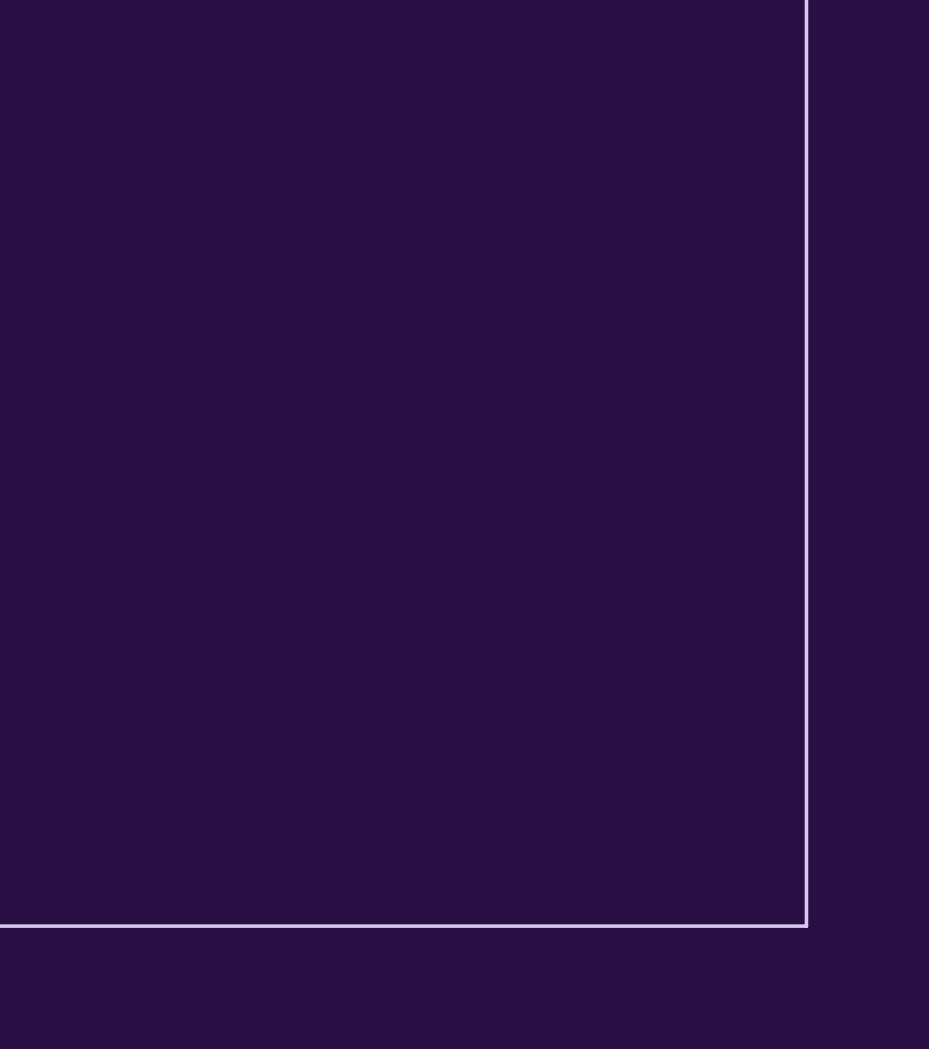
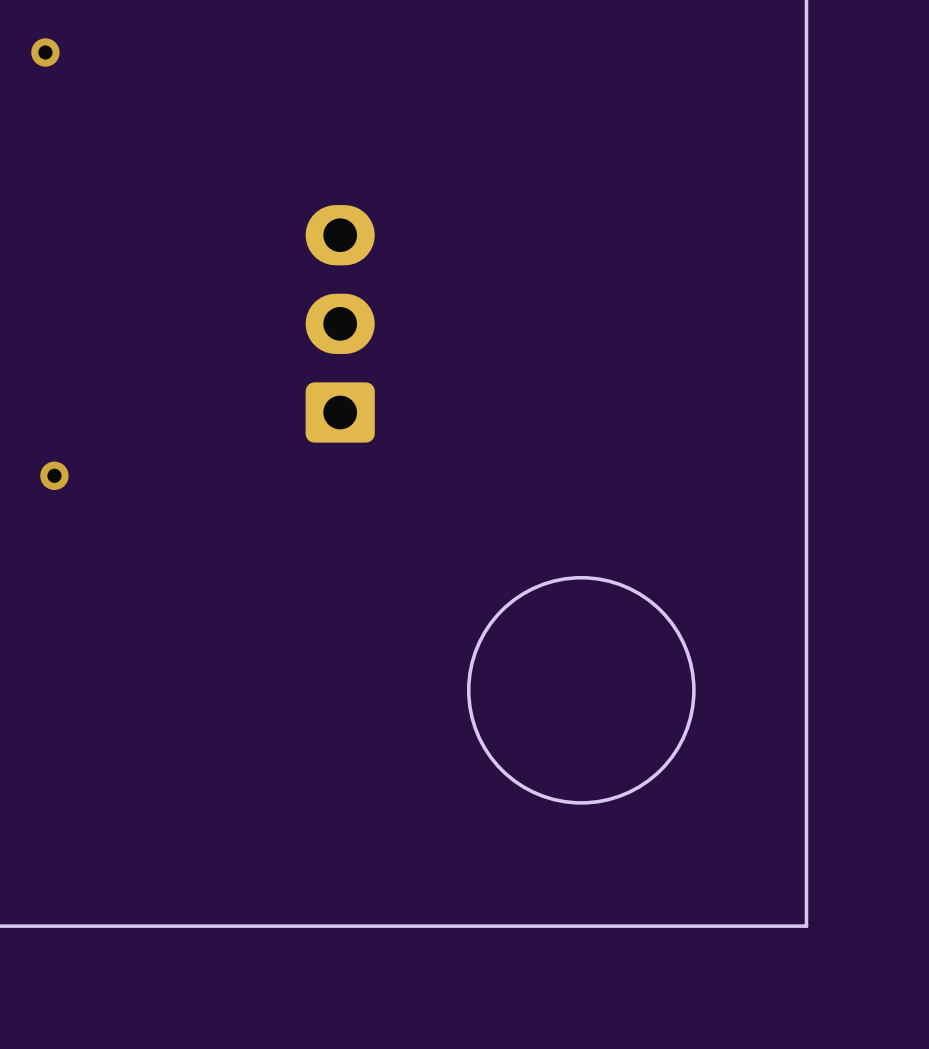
via: none -> (45, 52)
part: none -> (340, 323)
via: none -> (54, 475)
round board edge: none -> [466, 575, 696, 805]

